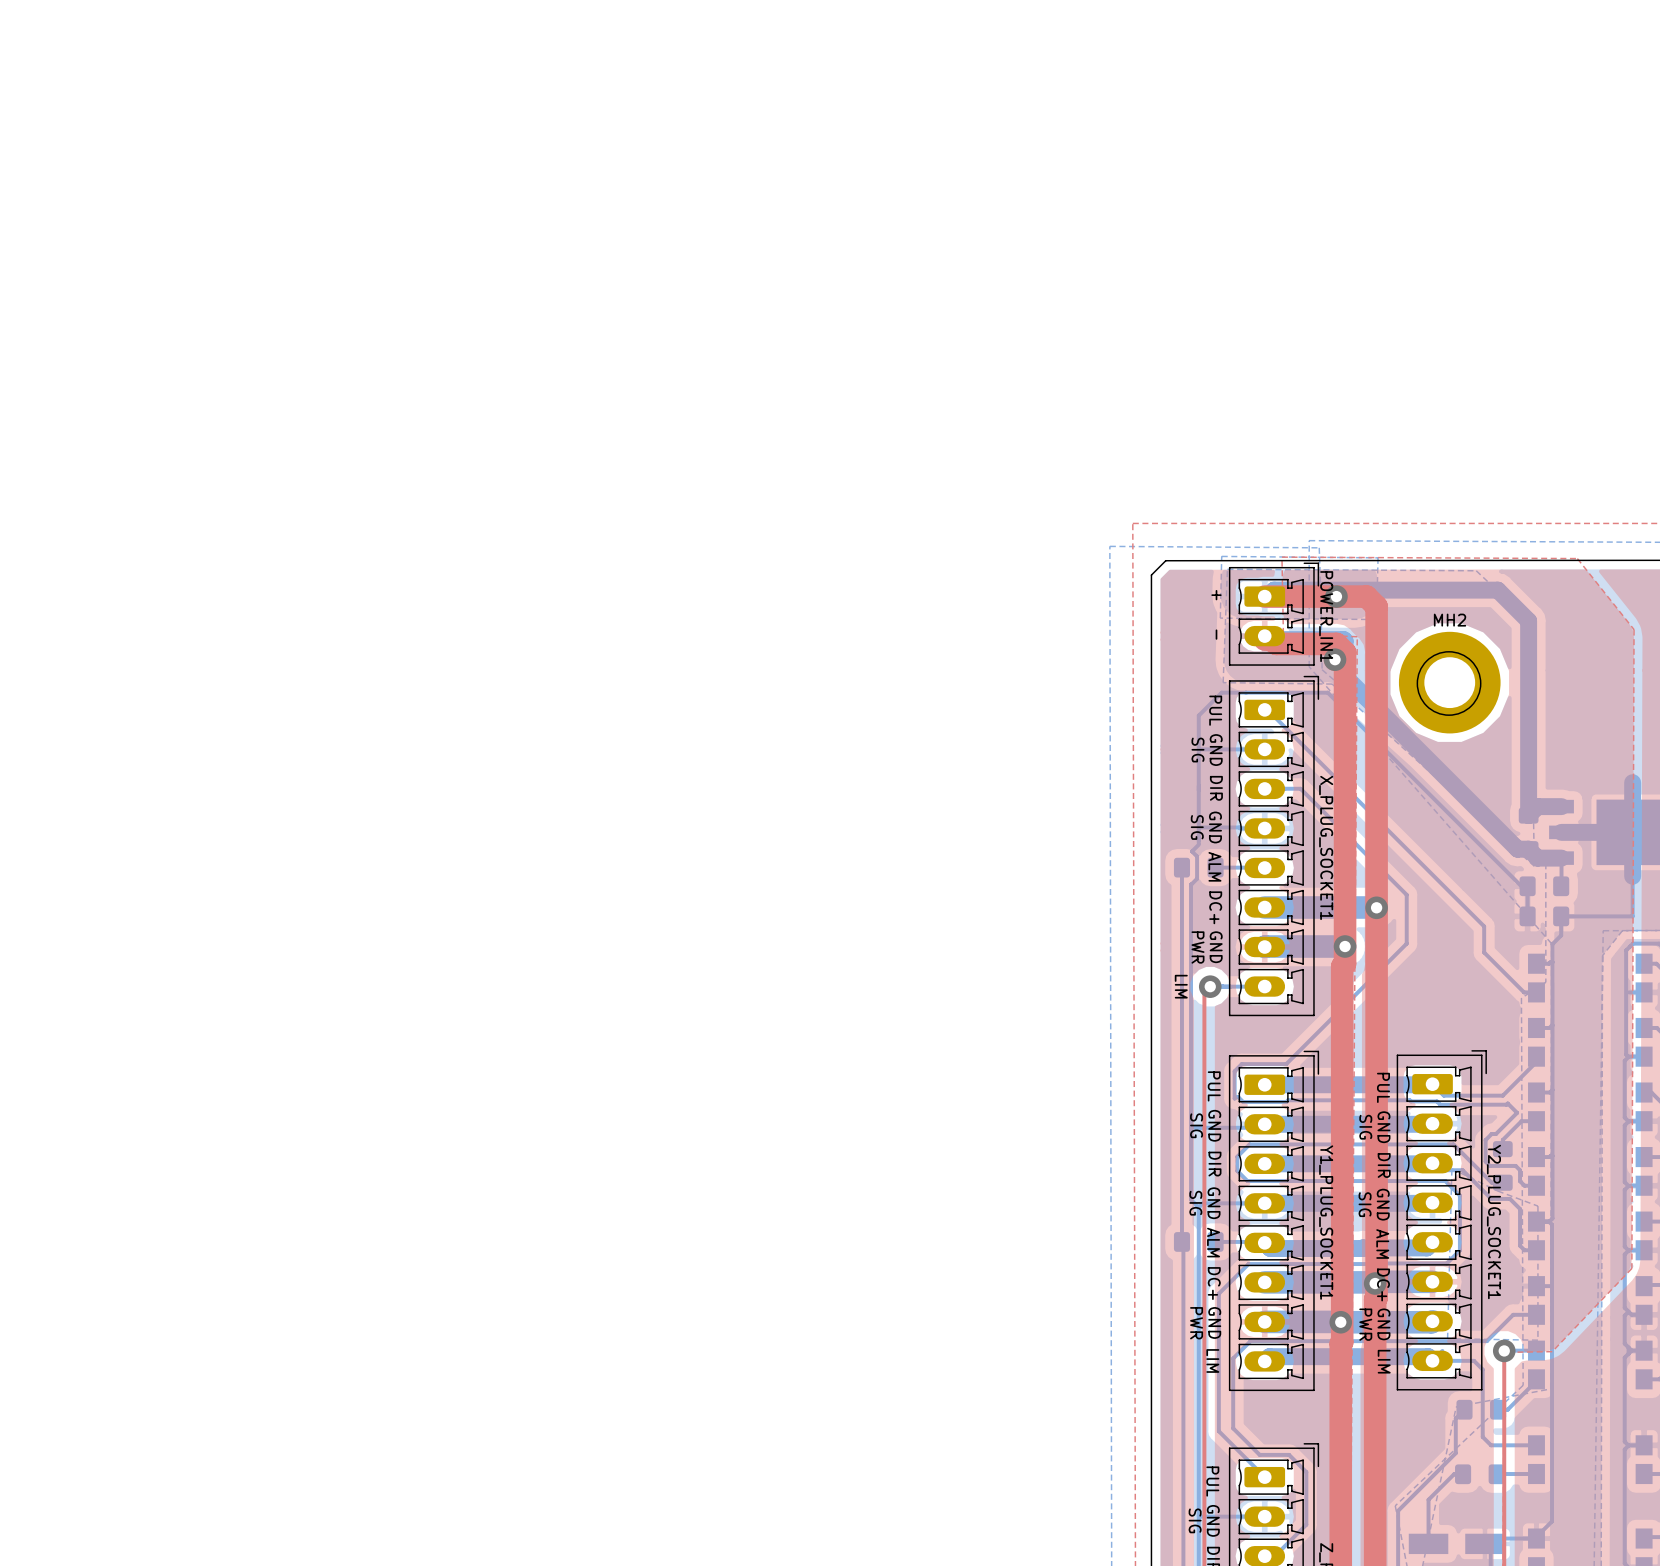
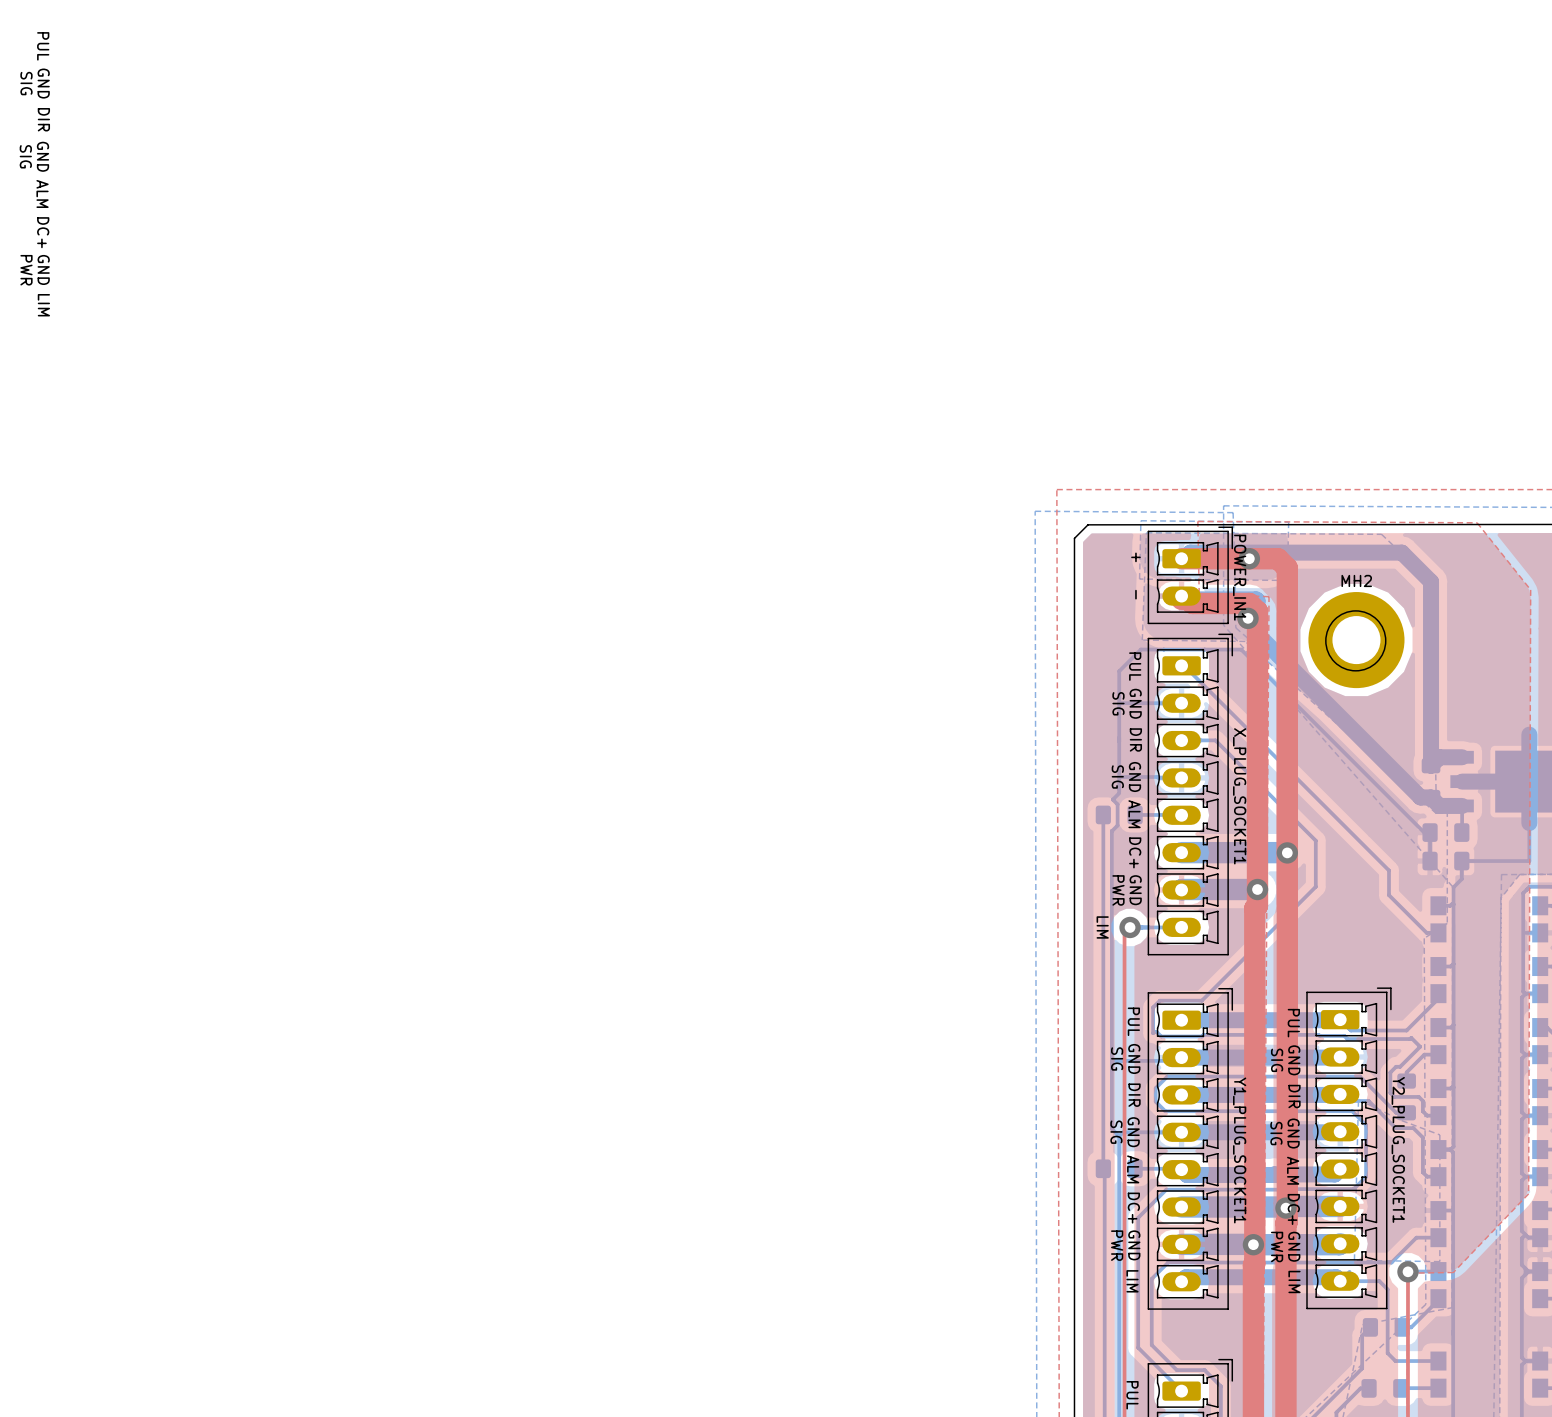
text: none -> PUL (43, 46)
text: none -> SIG (26, 83)
text: none -> GND (43, 83)
text: none -> DIR (43, 119)
text: none -> SIG (25, 156)
text: none -> GND (42, 156)
text: none -> ALM (42, 193)
text: none -> DC+ (43, 232)
text: none -> PWR (26, 270)
text: none -> GND (43, 269)
text: none -> LIM (43, 305)

